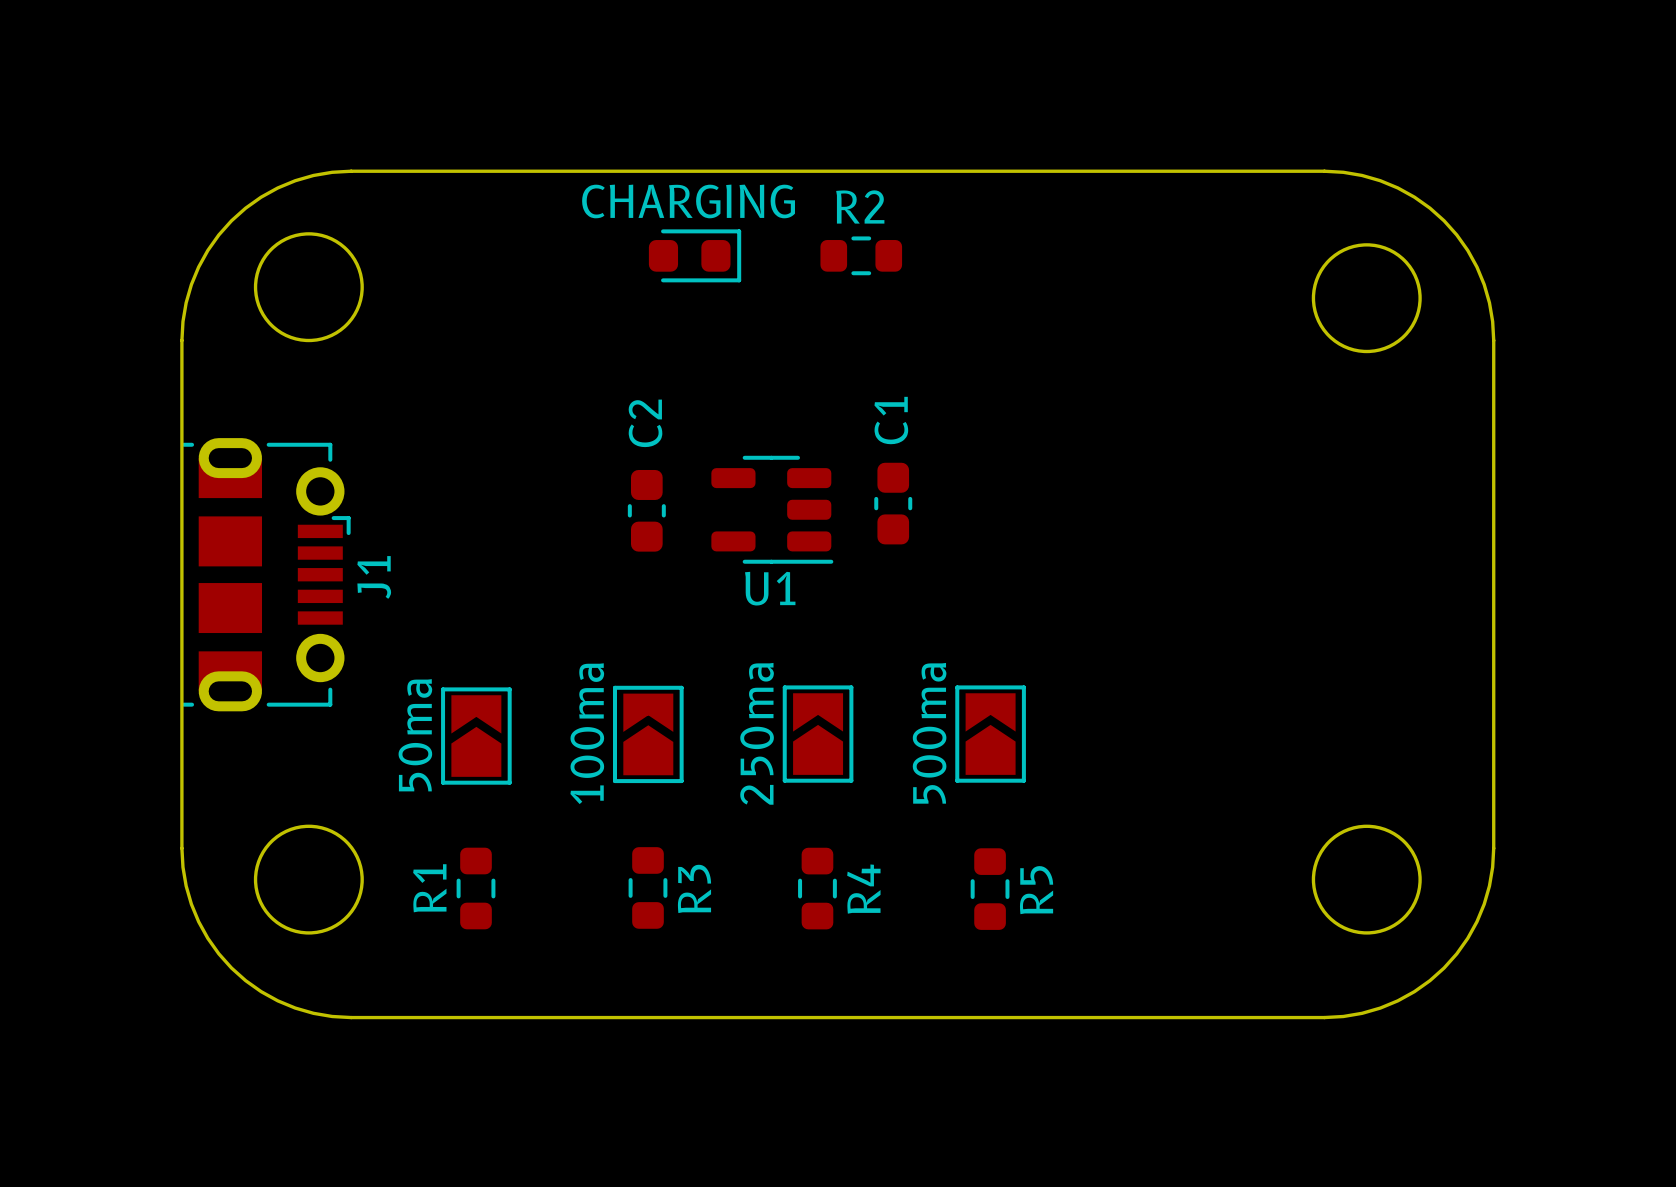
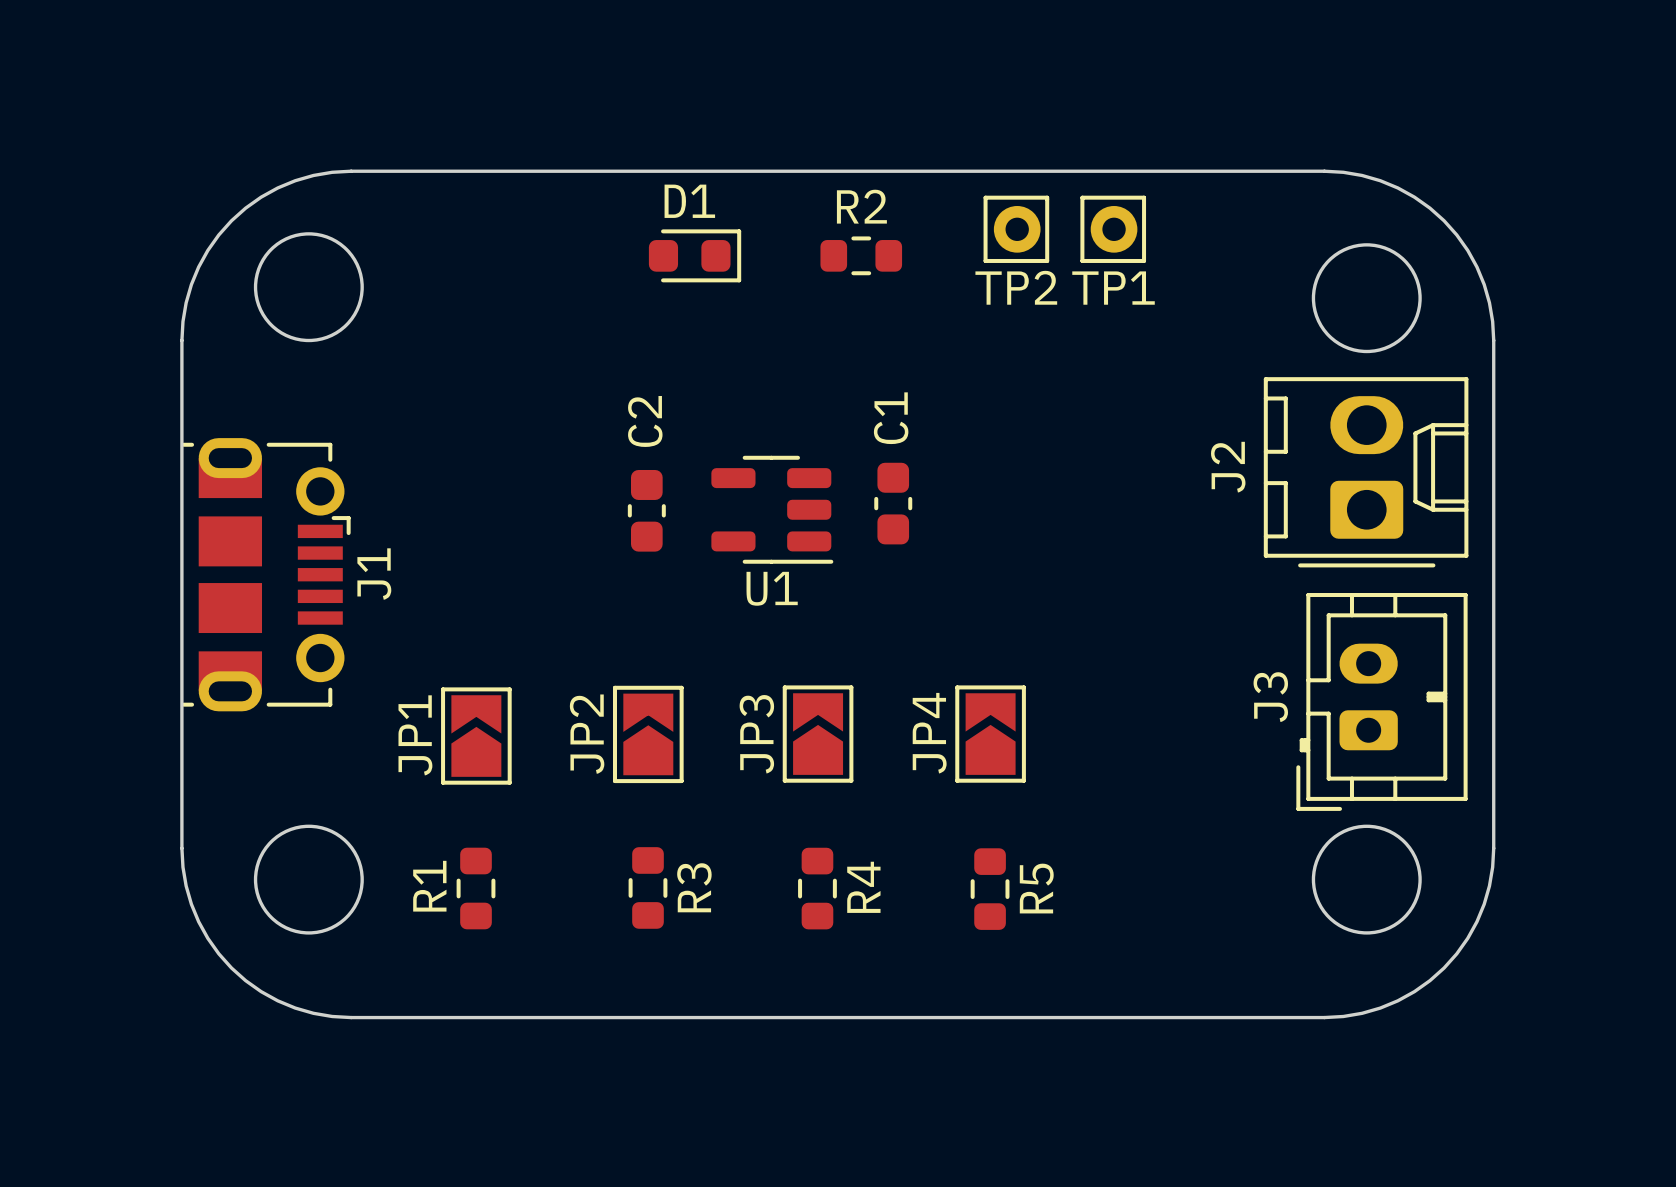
CHARGING name: CHARGING (688, 201) -> D1 (689, 201)
TP2: none -> (1016, 229)
TP1: none -> (1113, 229)
J2: none -> (1366, 472)
J3: none -> (1381, 701)
100ma name: 100ma (587, 733) -> JP2 (587, 734)
250ma name: 250ma (757, 733) -> JP3 (756, 734)
500ma name: 500ma (929, 733) -> JP4 (929, 733)
50ma name: 50ma (415, 735) -> JP1 (415, 735)

